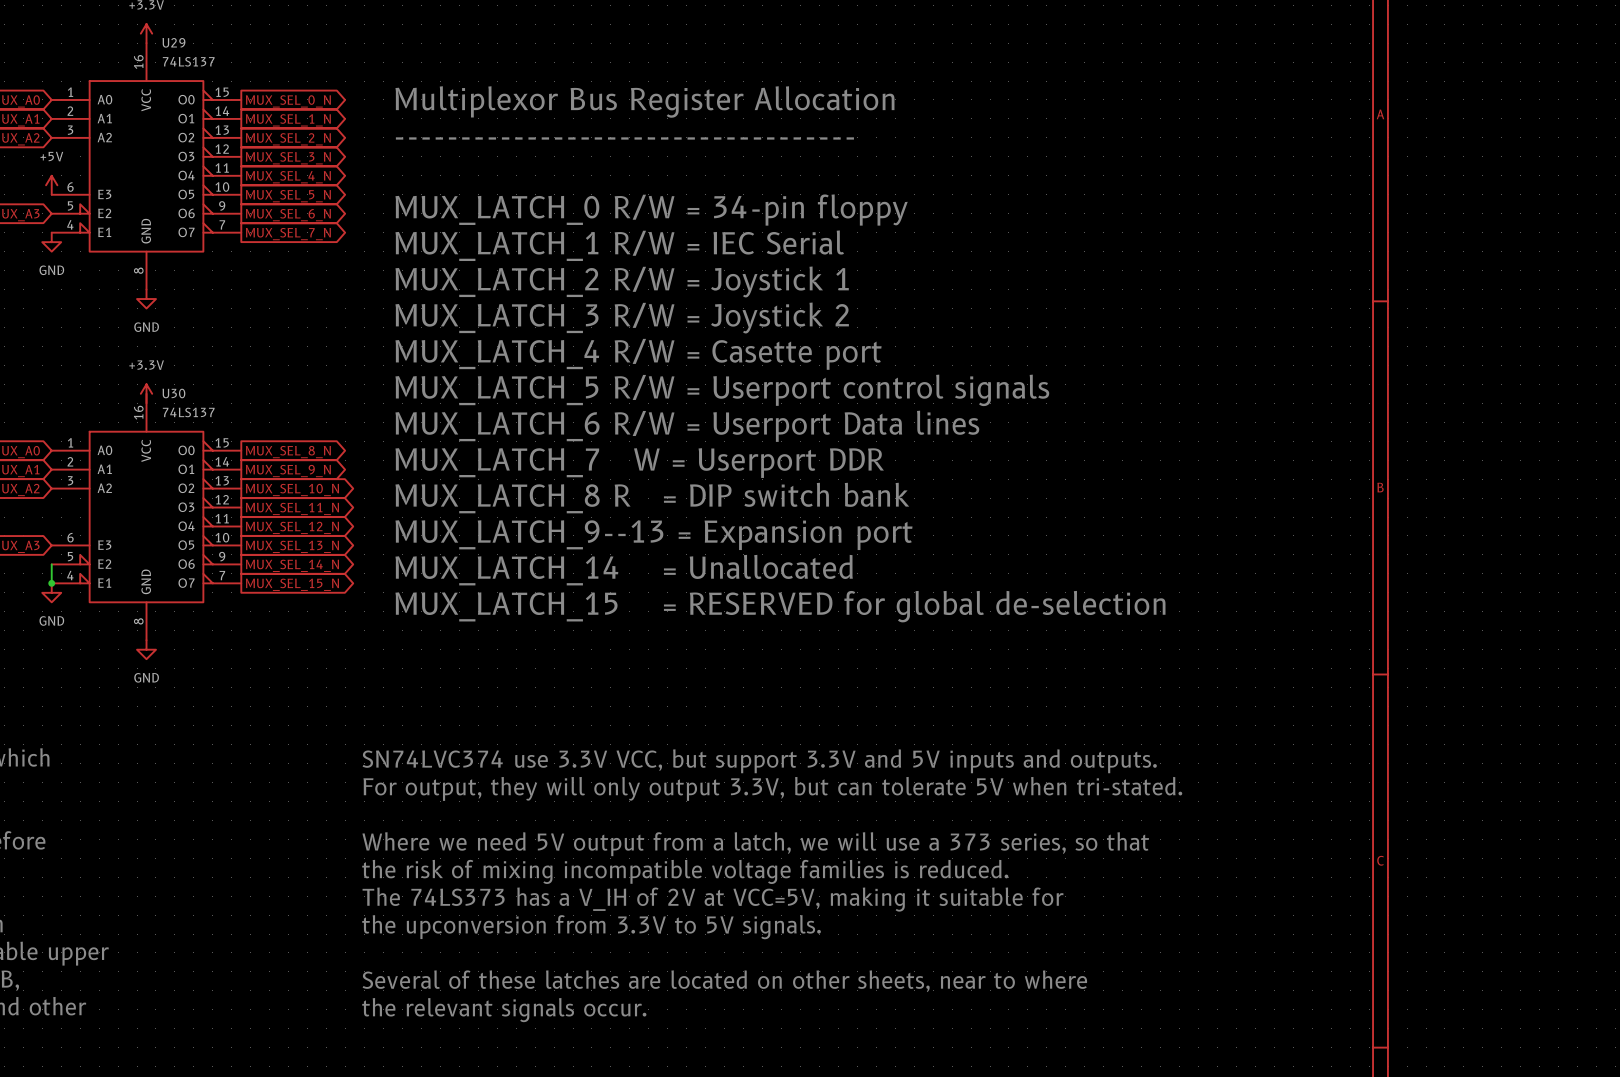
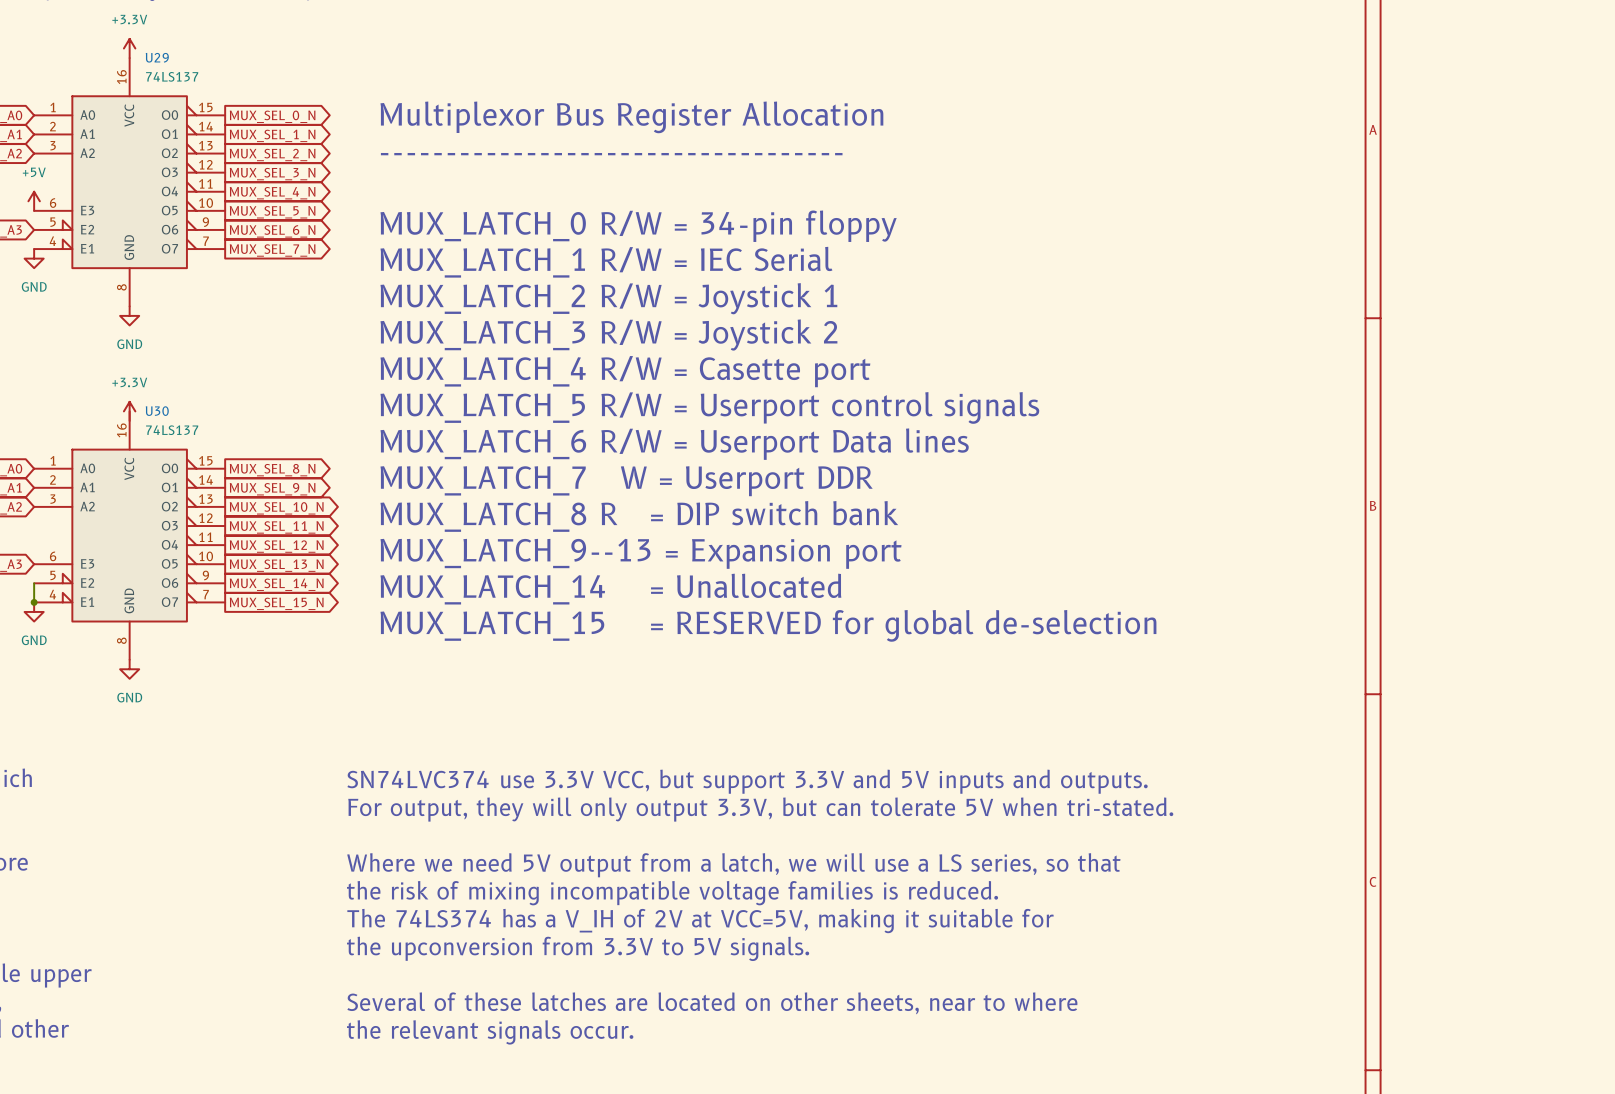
text: Where we need 5V output from a latch, we will use a 373 series, so that (755, 844) -> Where we need 5V output from a latch, we will use a LS series, so that (733, 865)
text: The 74LS373 has a V_IH of 2V at VCC=5V, making it suitable for (713, 899) -> The 74LS374 has a V_IH of 2V at VCC=5V, making it suitable for (700, 921)

